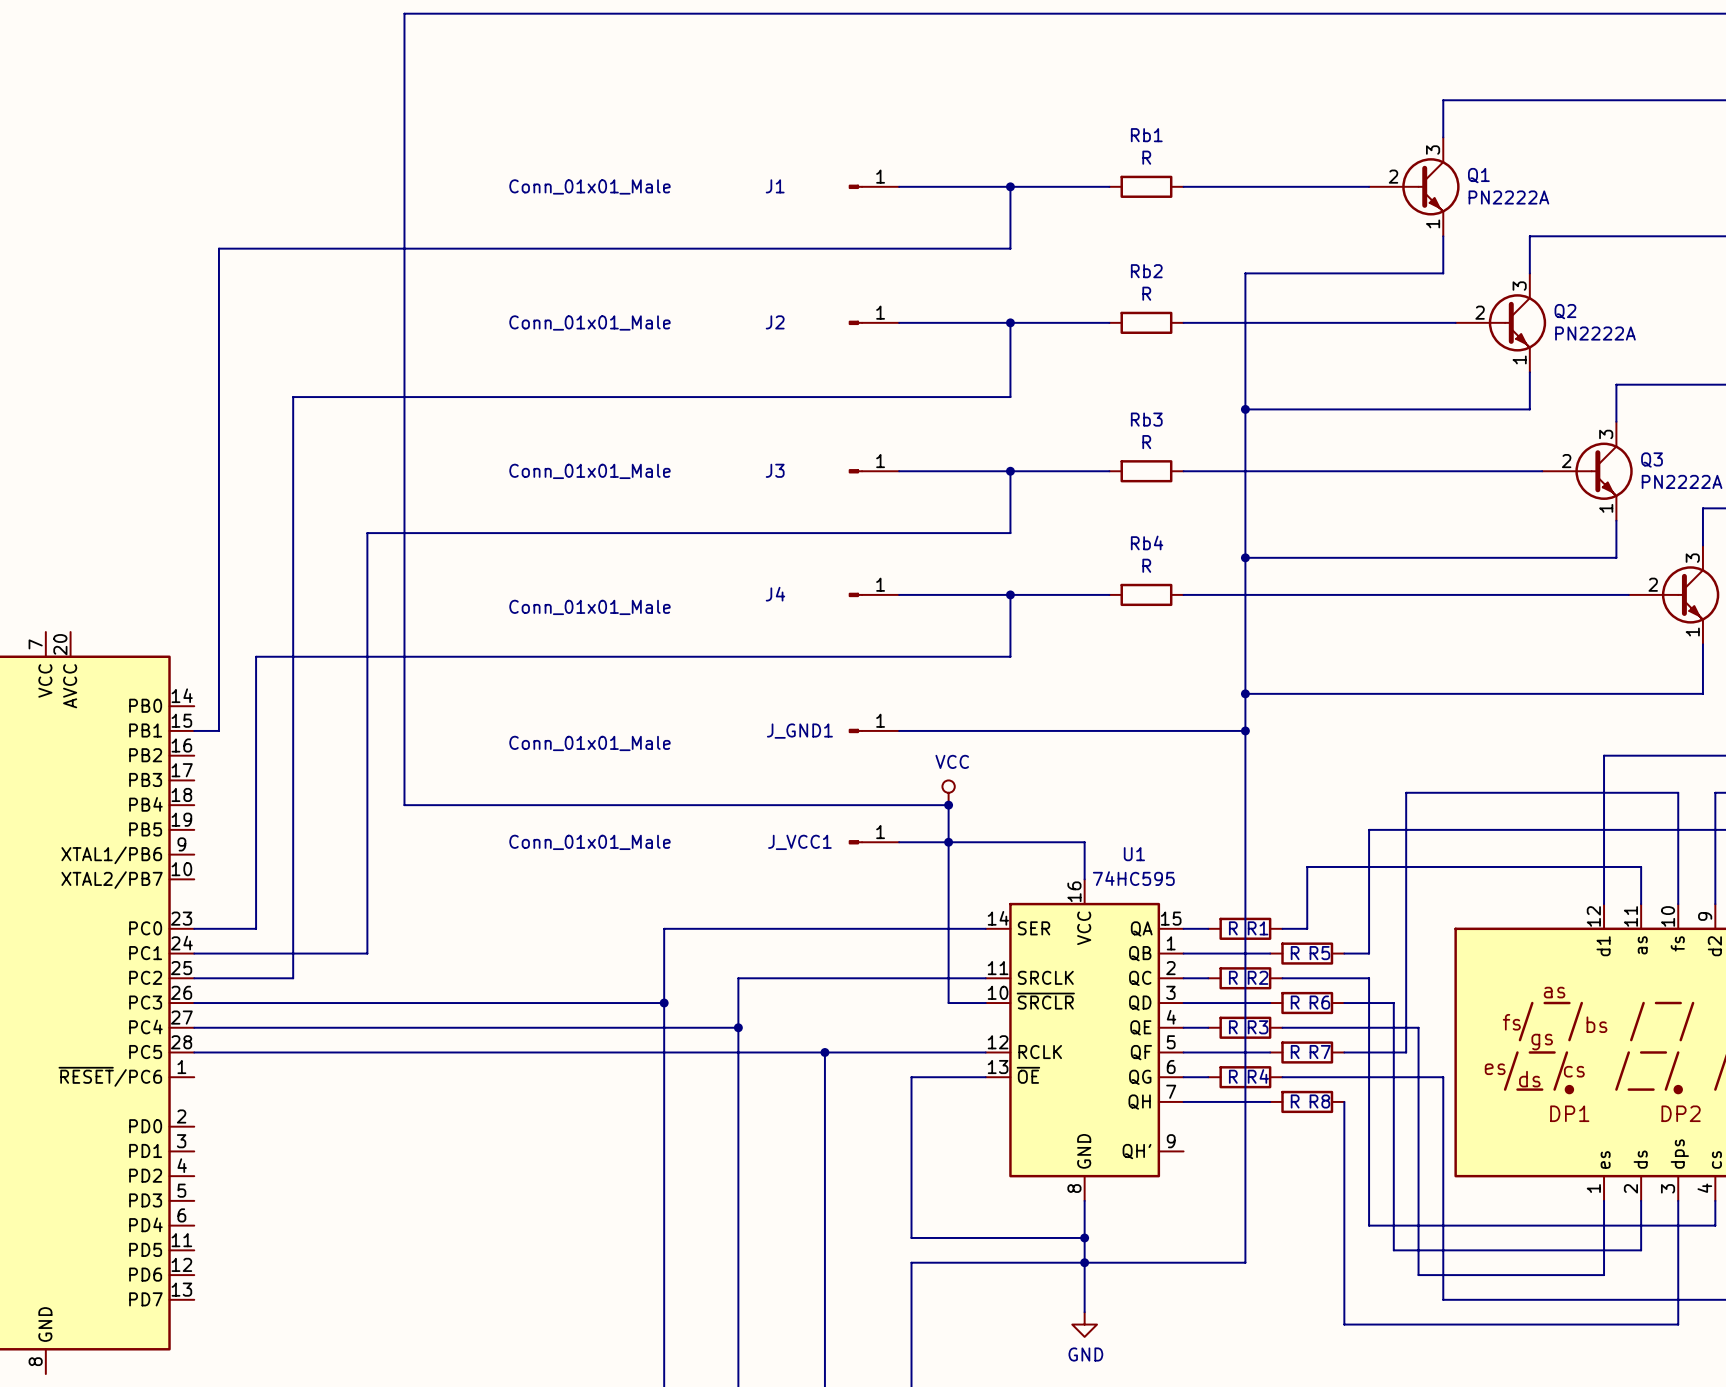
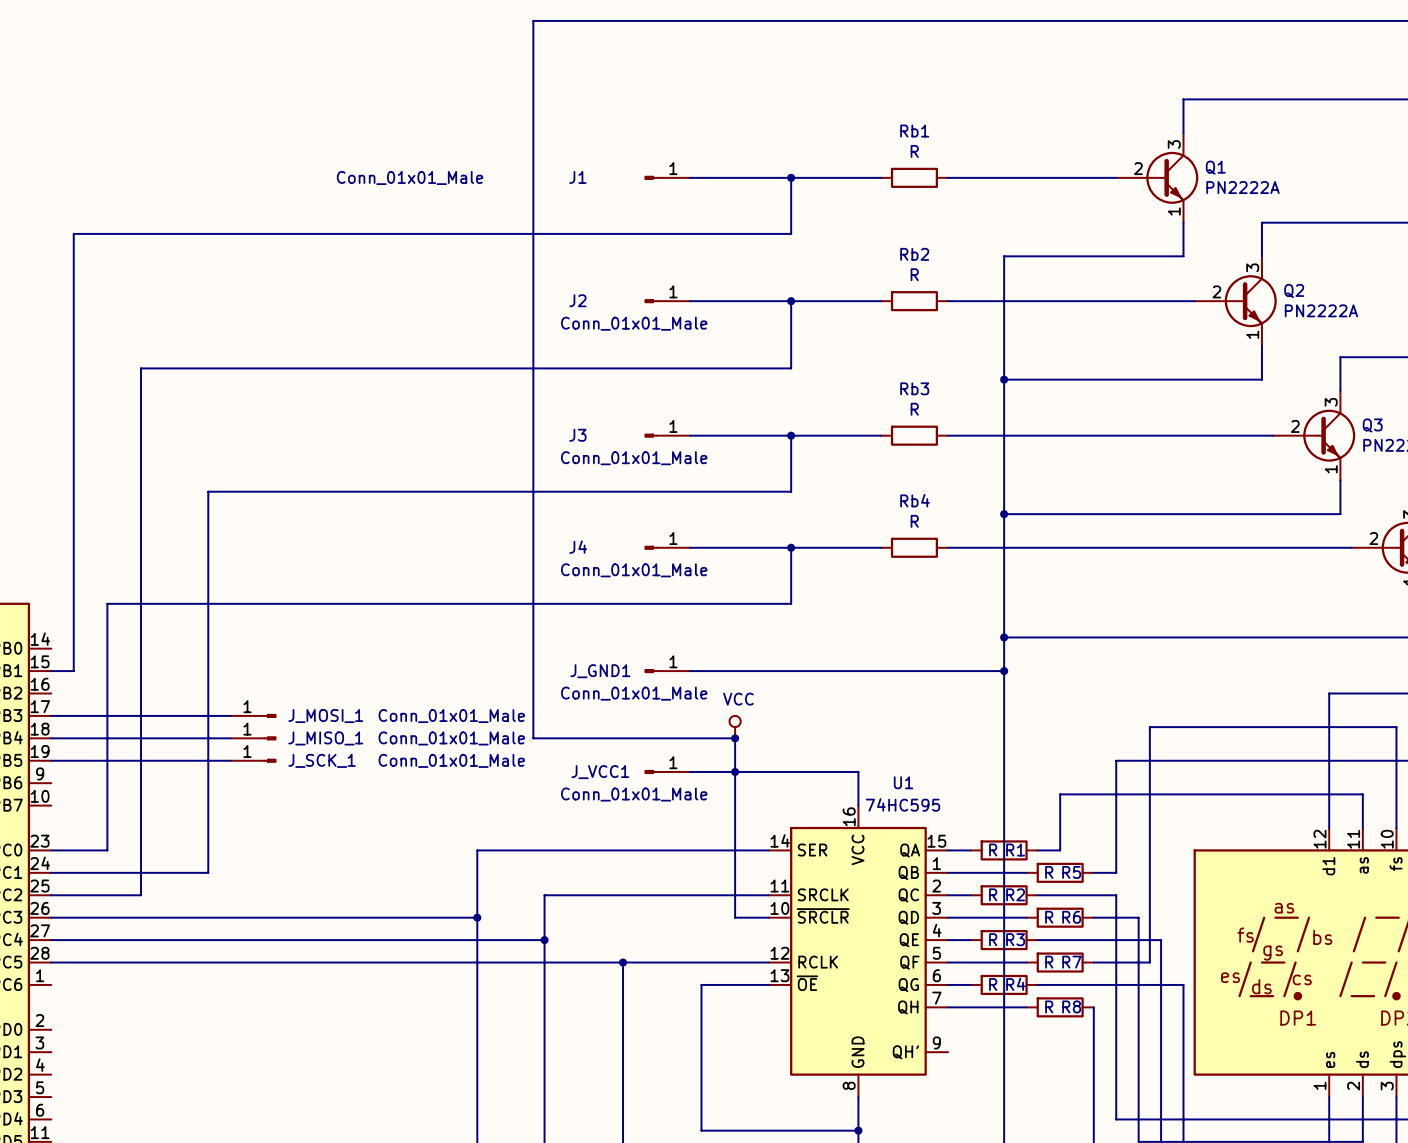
wire: (726, 13) (404, 13) (404, 805) (726, 805) -> (533, 20) (533, 738)
J2 value position: Conn_01x01_Male (589, 322) -> Conn_01x01_Male (634, 323)
J3 value position: Conn_01x01_Male (589, 471) -> Conn_01x01_Male (634, 458)
J4 value position: Conn_01x01_Male (589, 607) -> Conn_01x01_Male (634, 570)
J_GND1 value position: Conn_01x01_Male (589, 743) -> Conn_01x01_Male (634, 693)
wire: none -> (51, 715) (230, 715)
J_MOSI_1: none -> Conn_01x01_Male (253, 715)
wire: none -> (51, 738) (230, 738)
J_MISO_1: none -> Conn_01x01_Male (253, 738)
wire: none -> (51, 760) (230, 760)
J_SCK_1: none -> Conn_01x01_Male (253, 760)
J_VCC1 value position: Conn_01x01_Male (589, 842) -> Conn_01x01_Male (634, 794)

